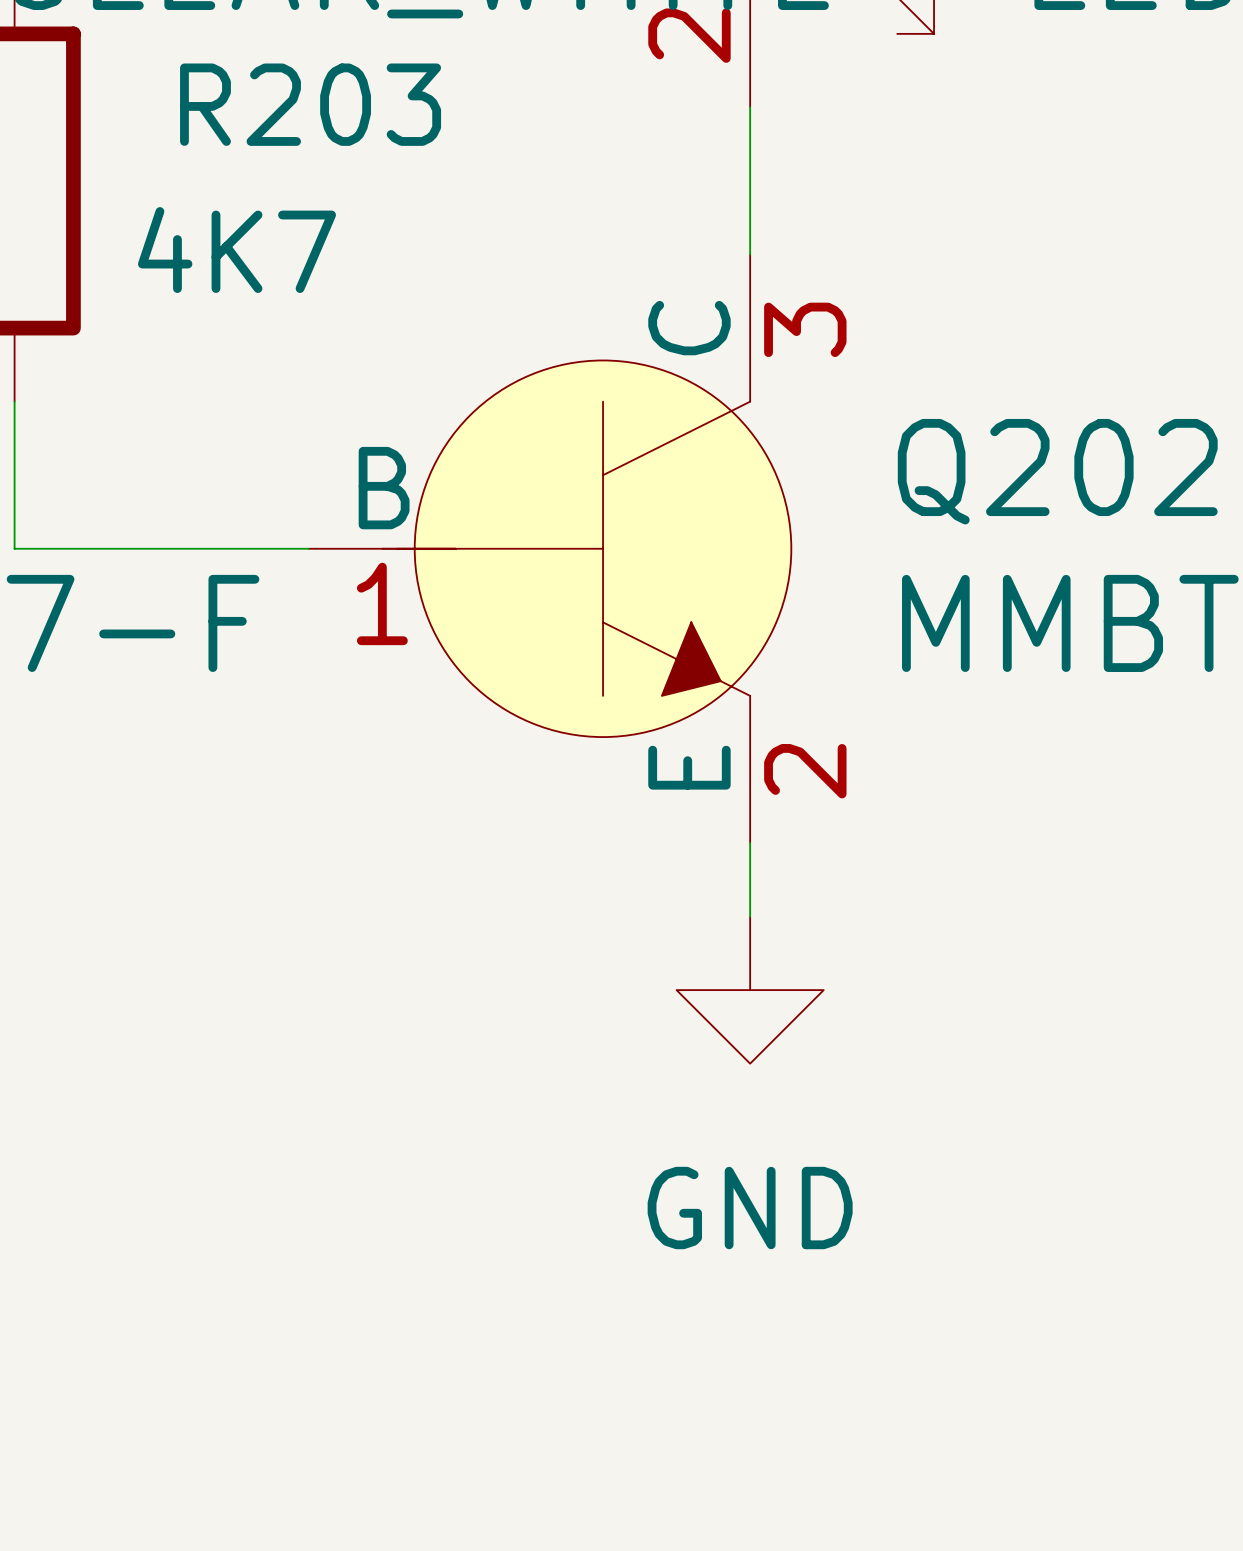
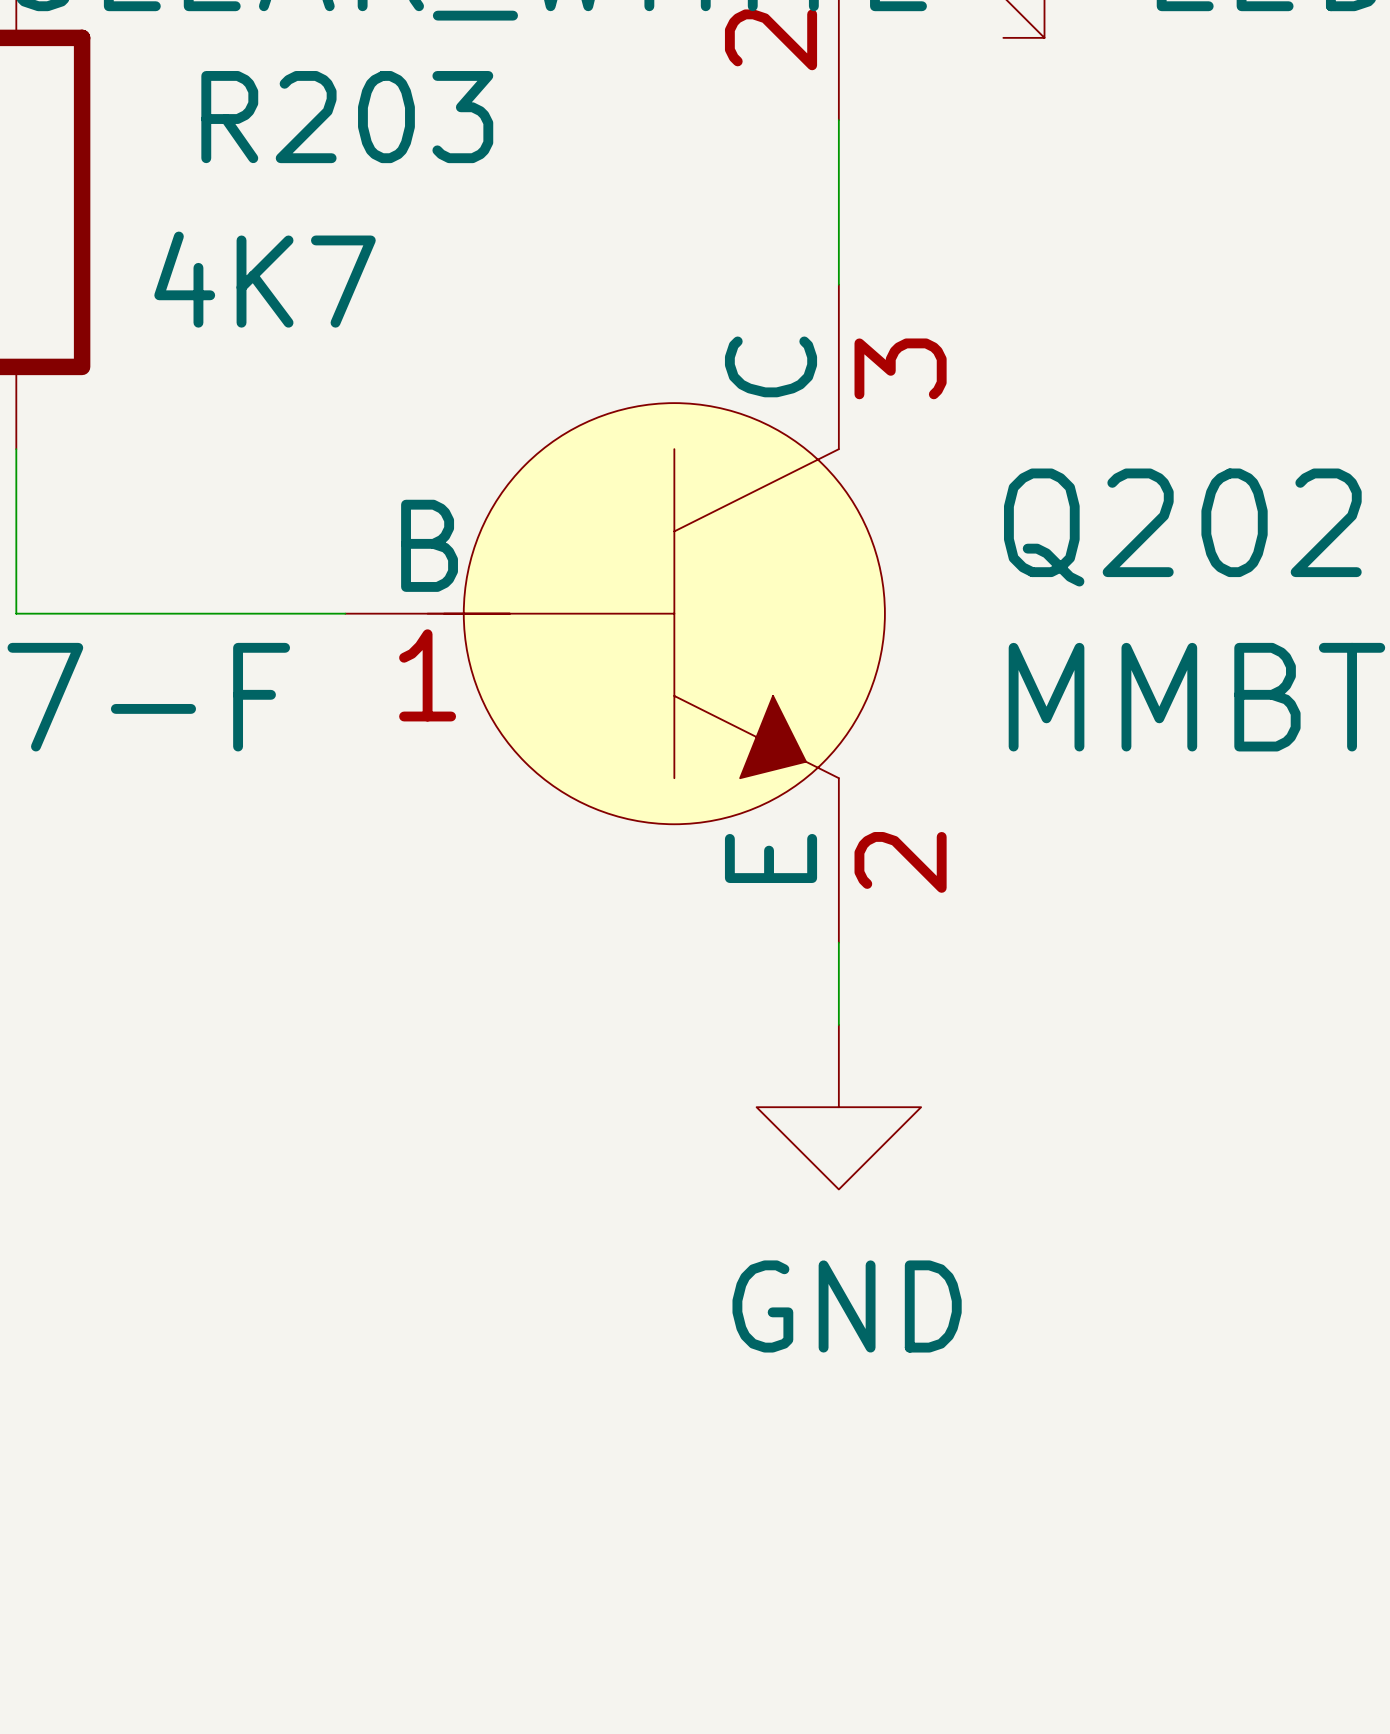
power symbol text position: GND (750, 1208) -> GND (847, 1306)

